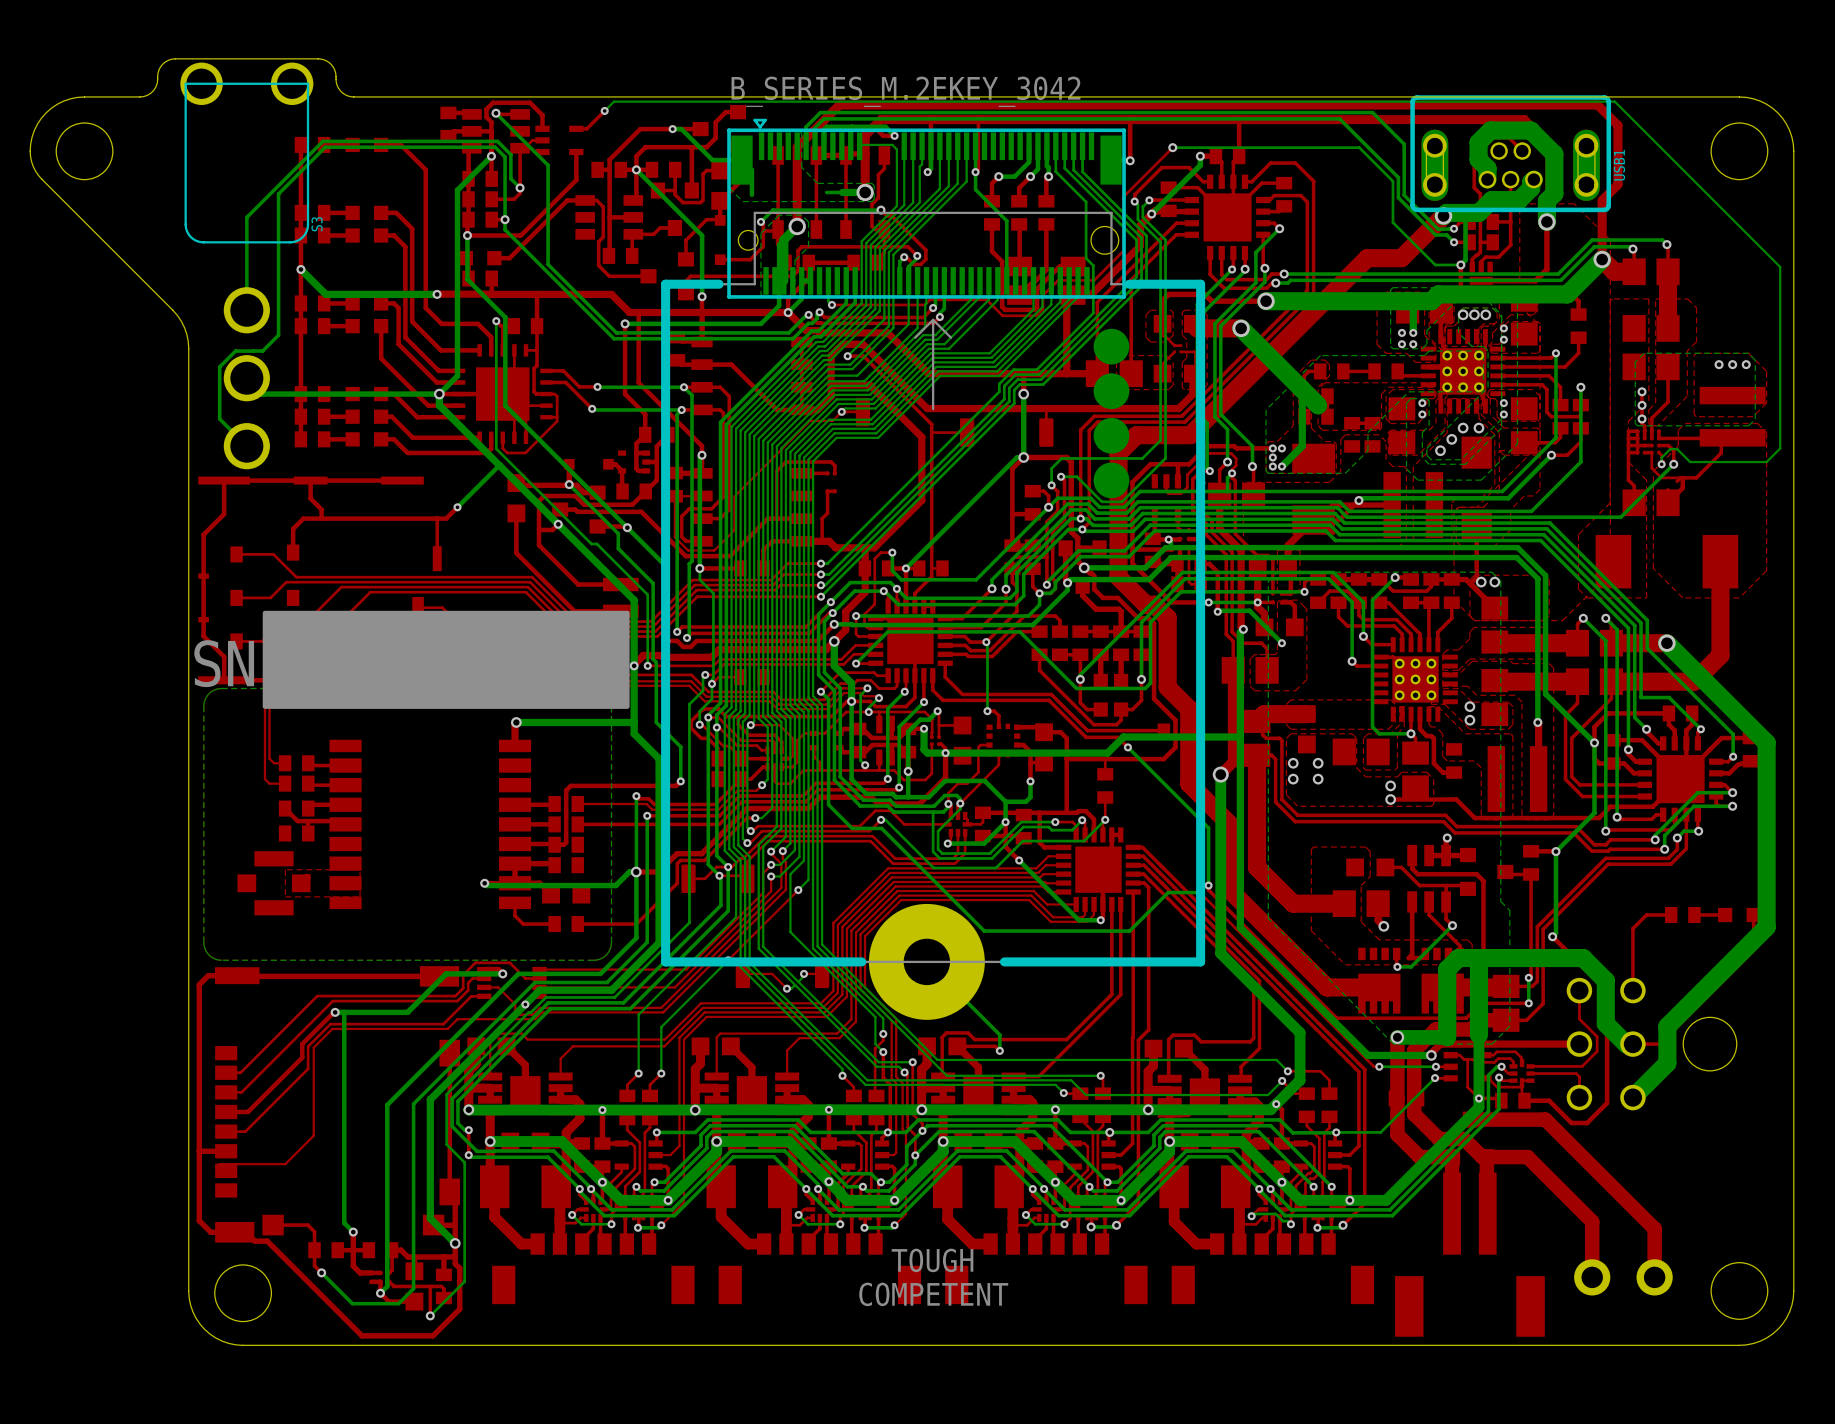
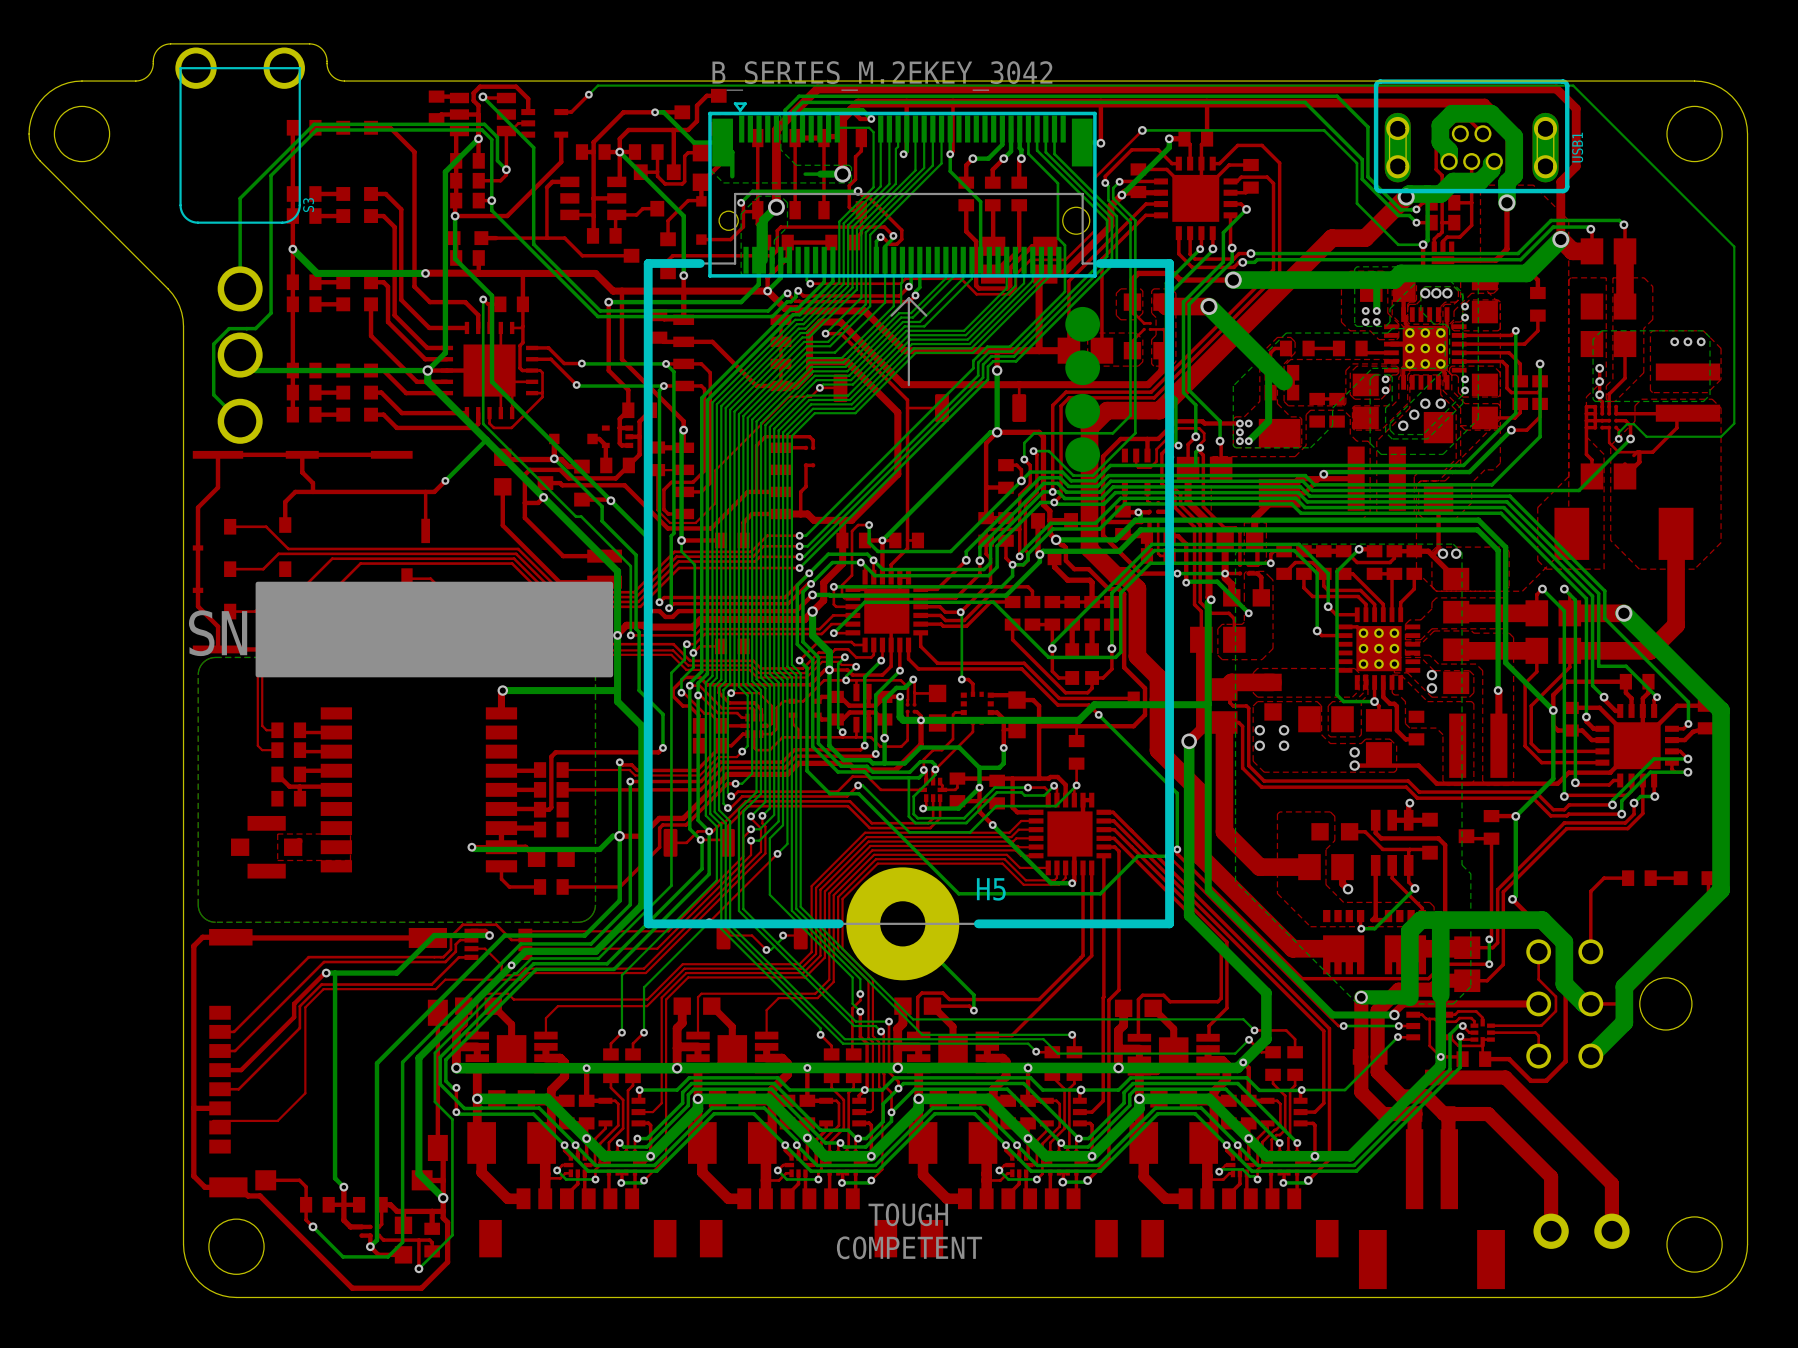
top track: (585, 200) (596, 200) (603, 206) (603, 237) (598, 241) (598, 265) (609, 276) -> (496, 238) (564, 238) (582, 255) (593, 255)
top track: (561, 206) (509, 258) -> (546, 187) (546, 238)
top track: none -> (569, 214) (593, 216)
text: none -> H5 (991, 889)

